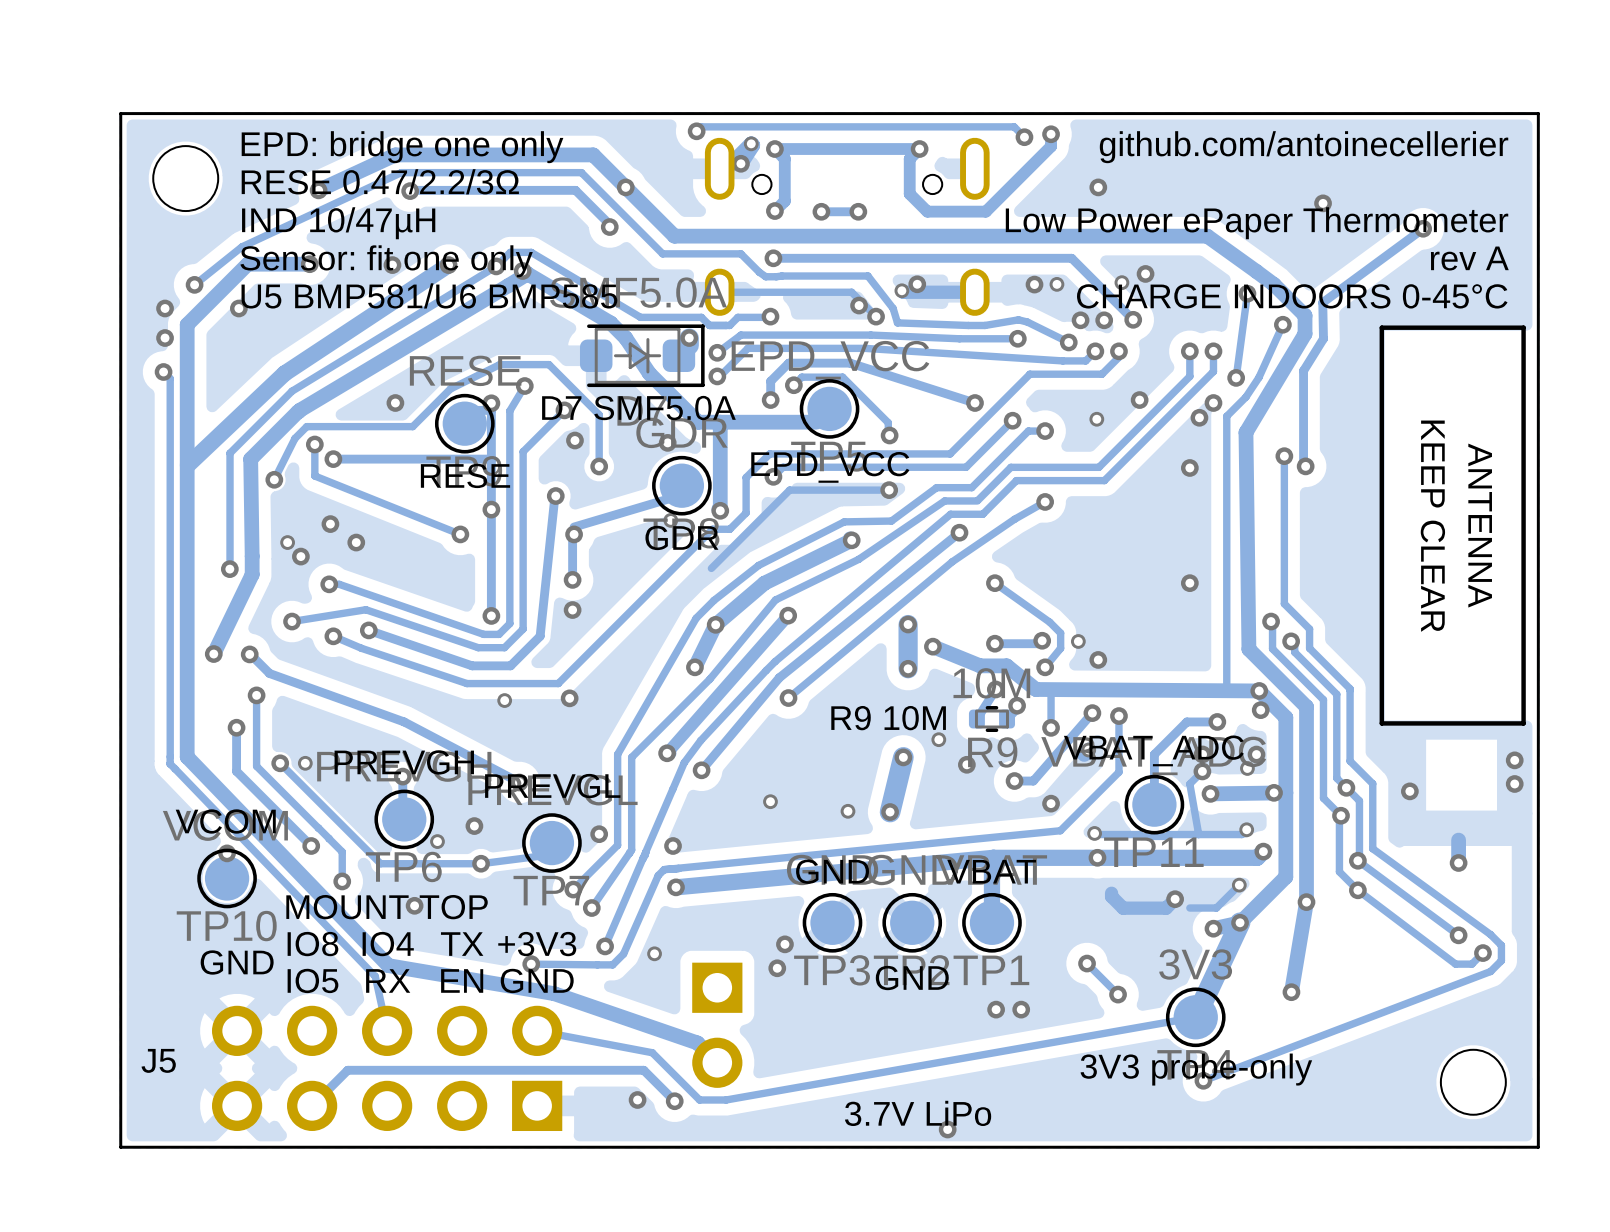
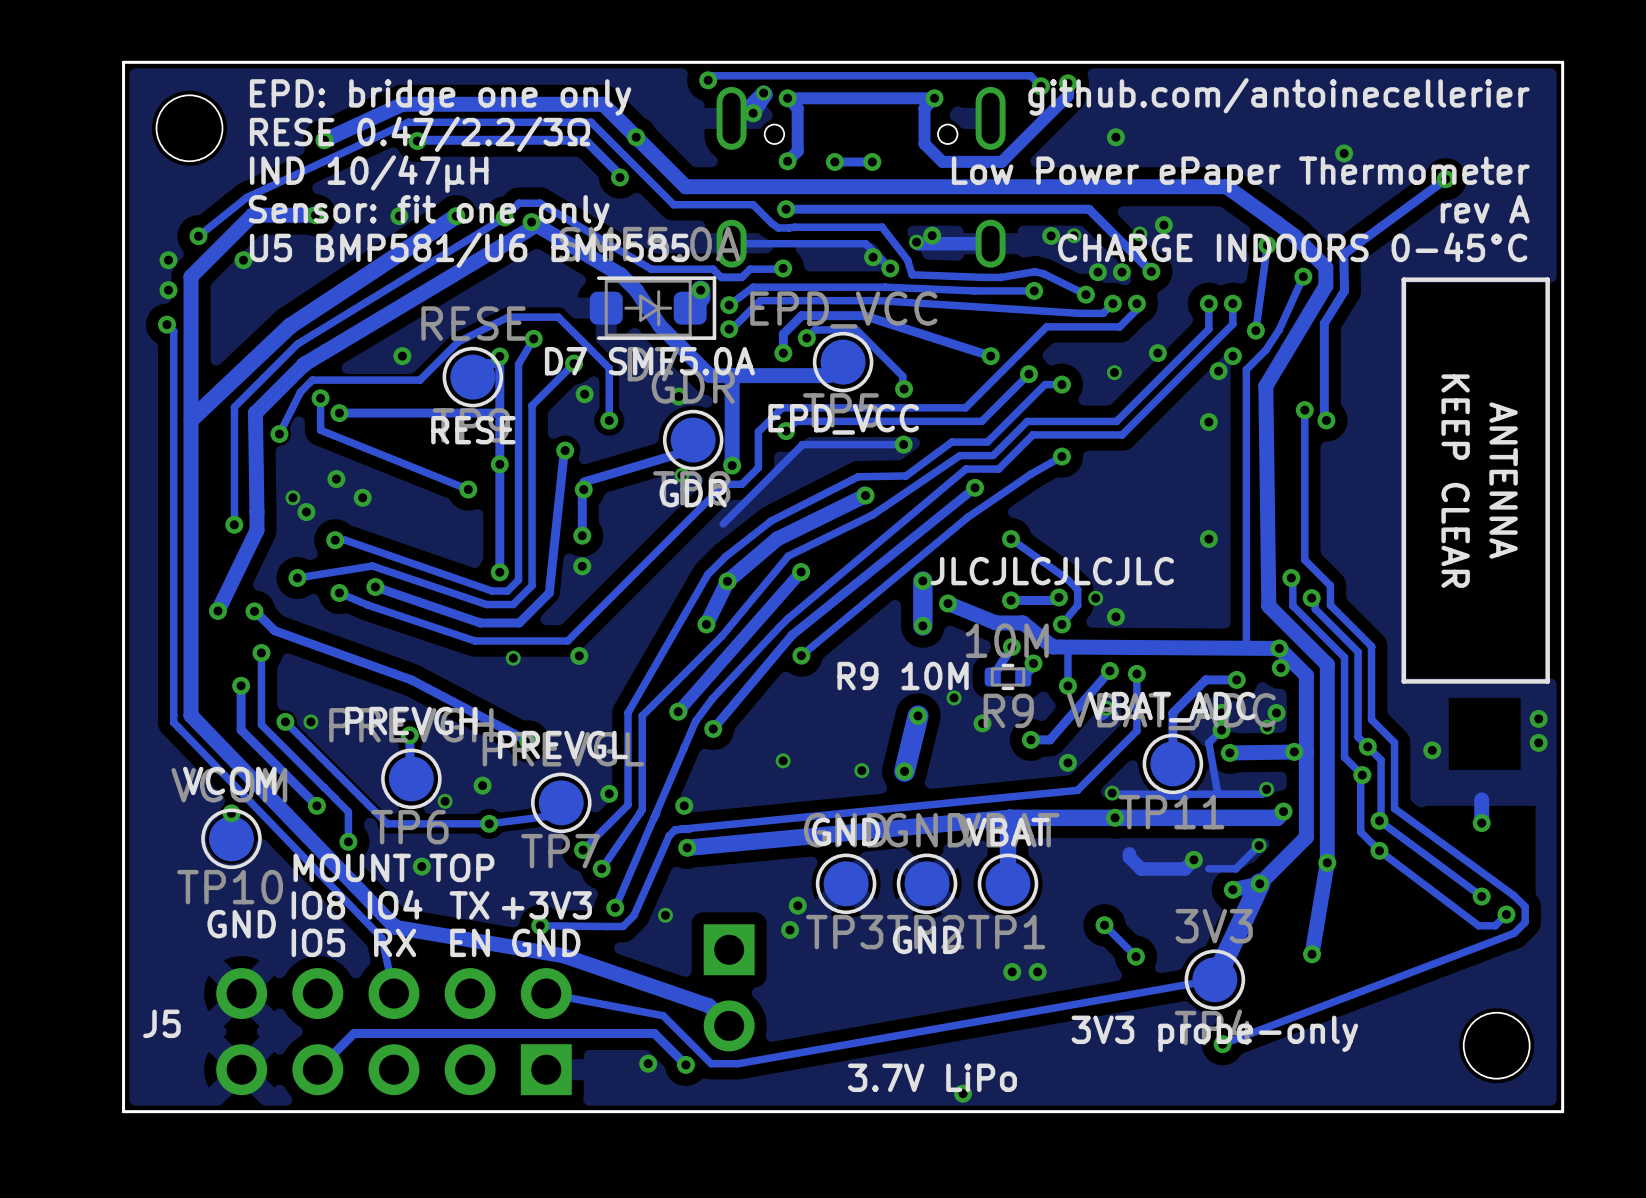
text: none -> JLCJLCJLCJLC (1052, 571)

